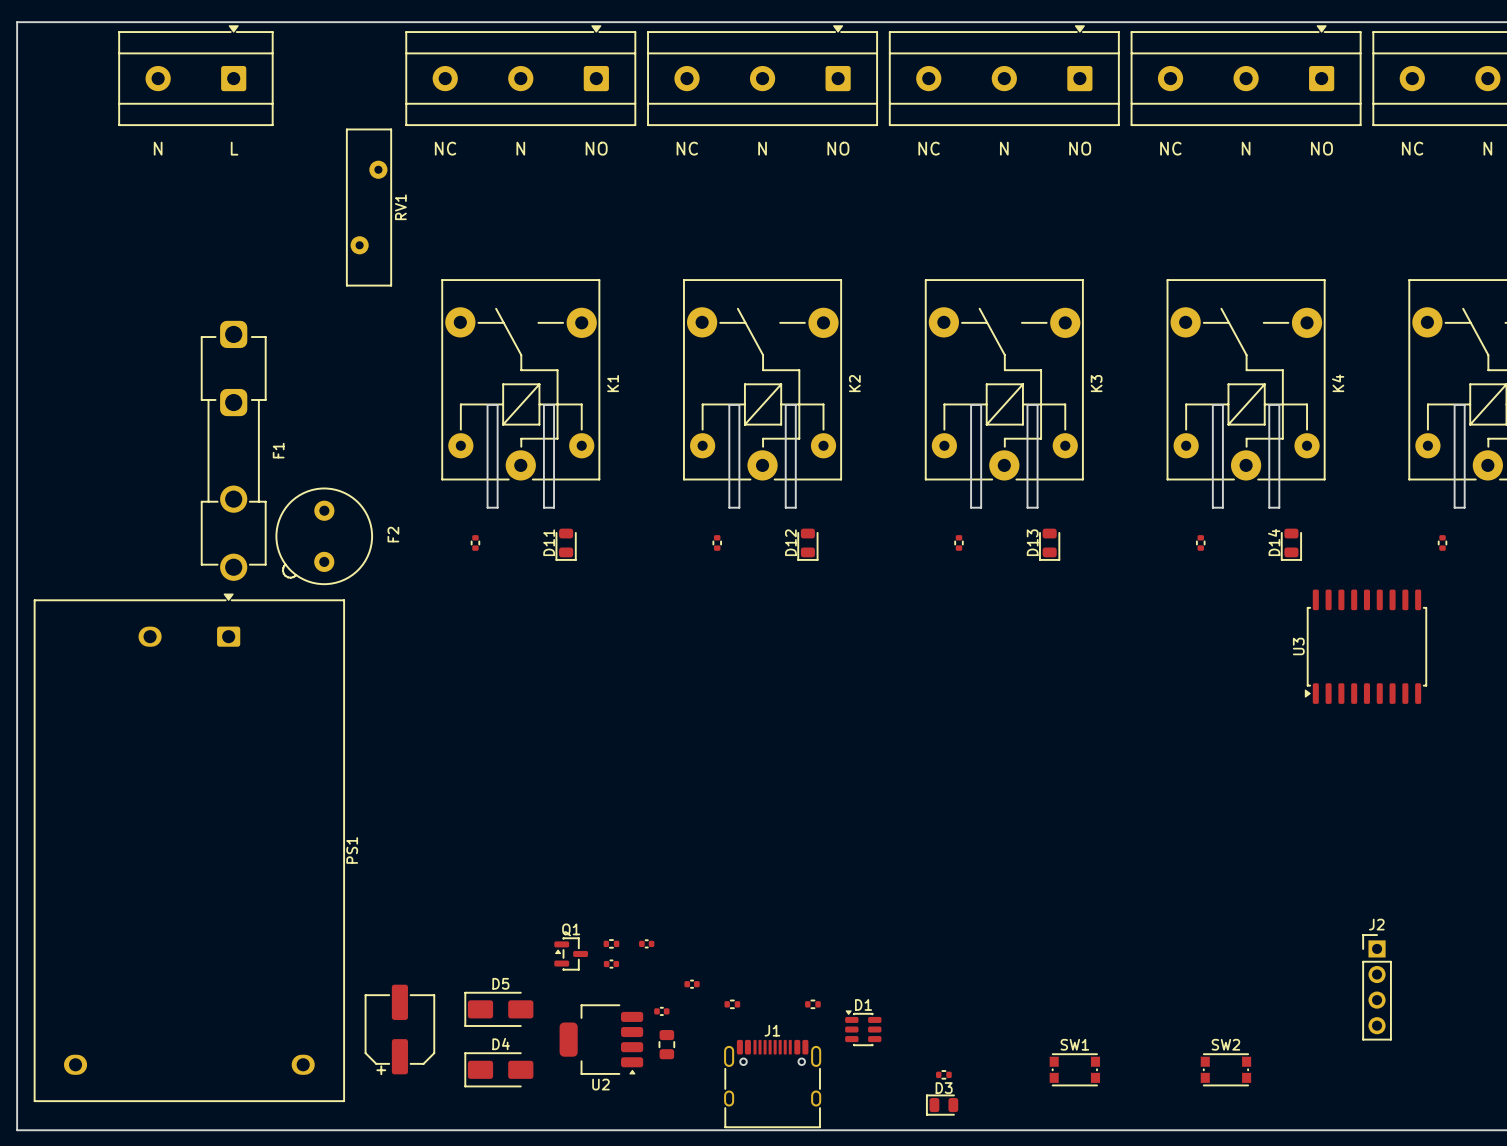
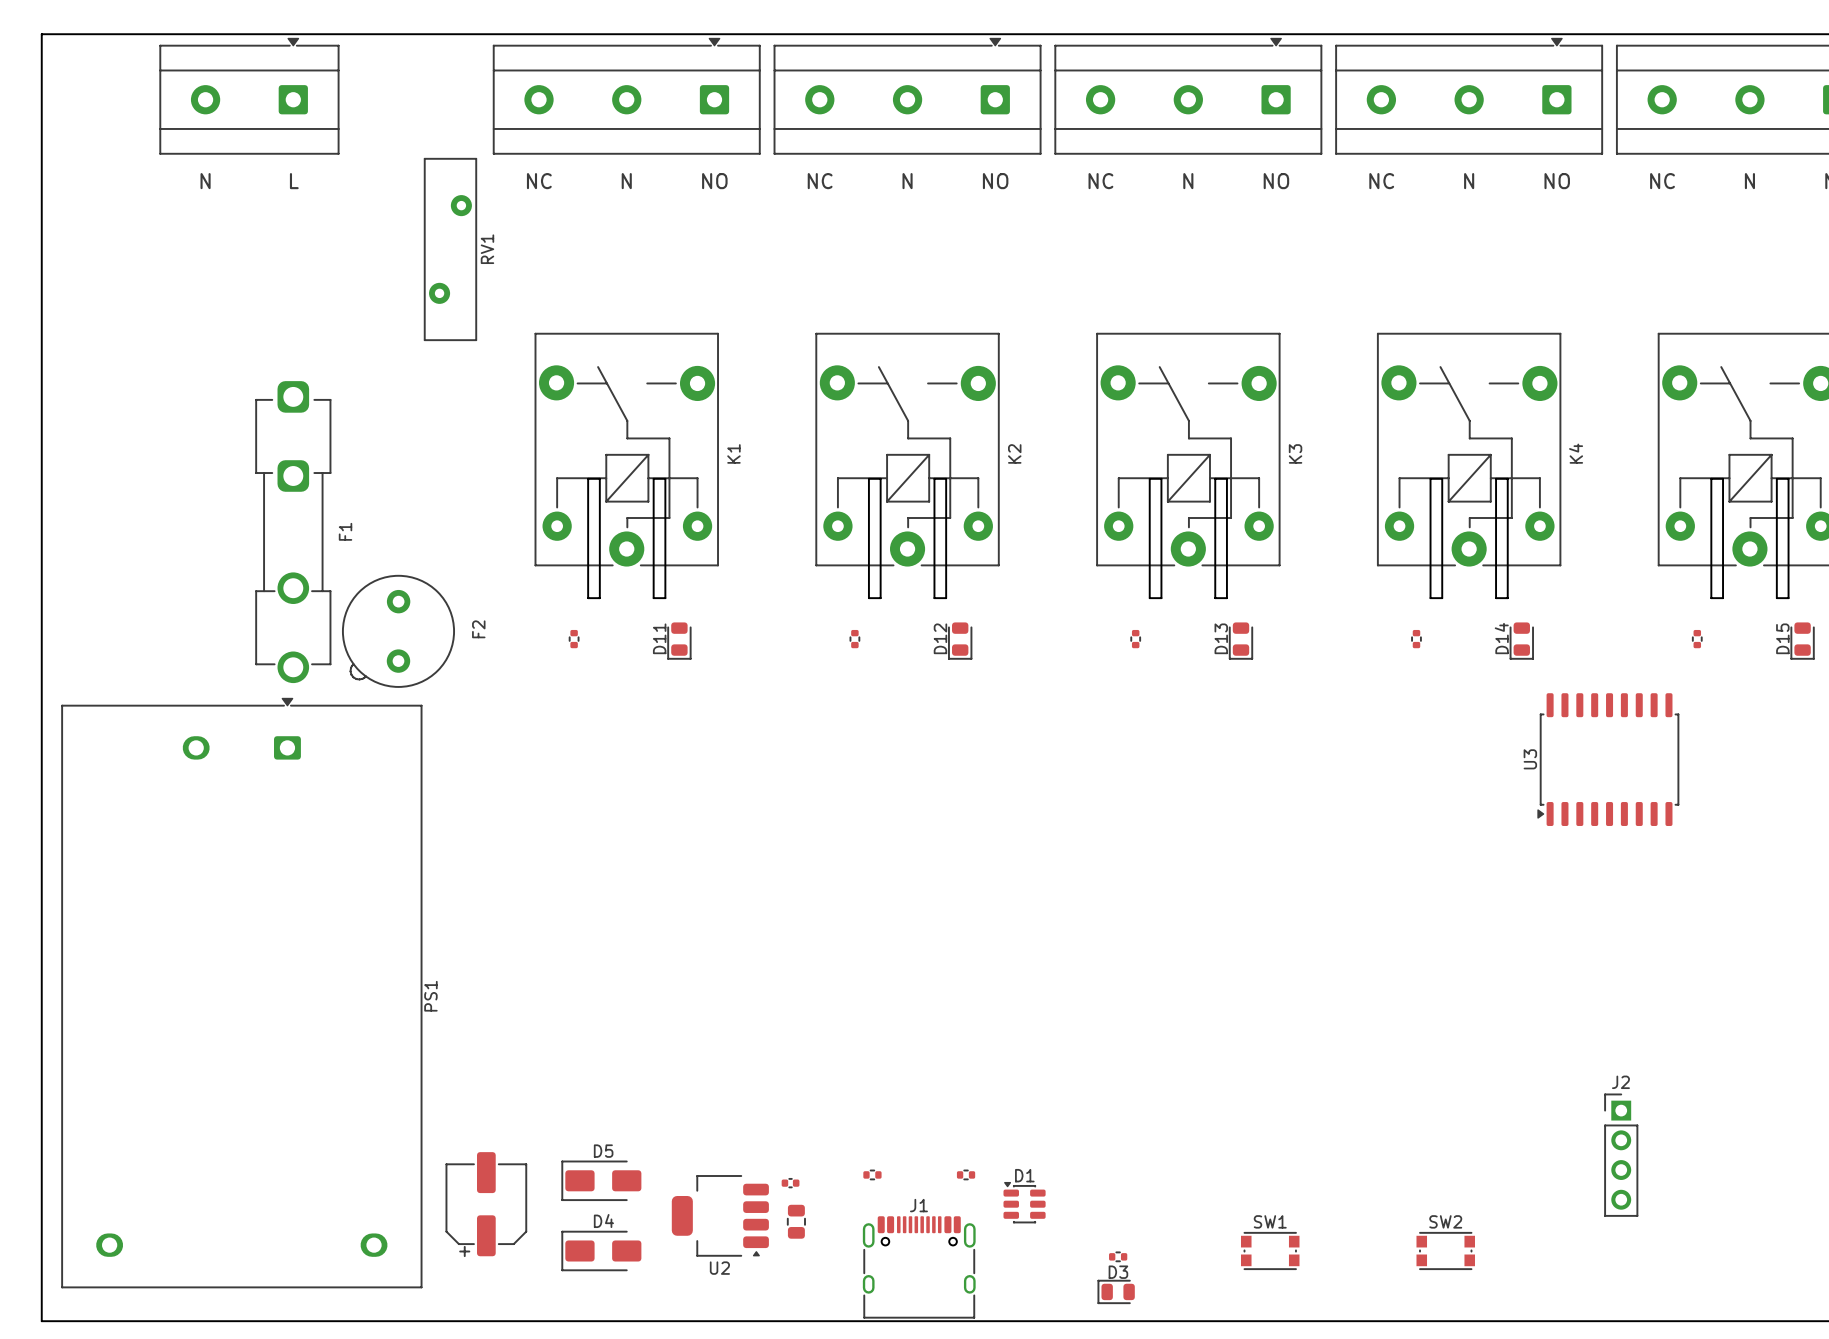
part: (611, 943) -> none
part: (646, 943) -> none
Q1: (571, 953) -> none
part: (611, 964) -> none
part: (692, 984) -> none

